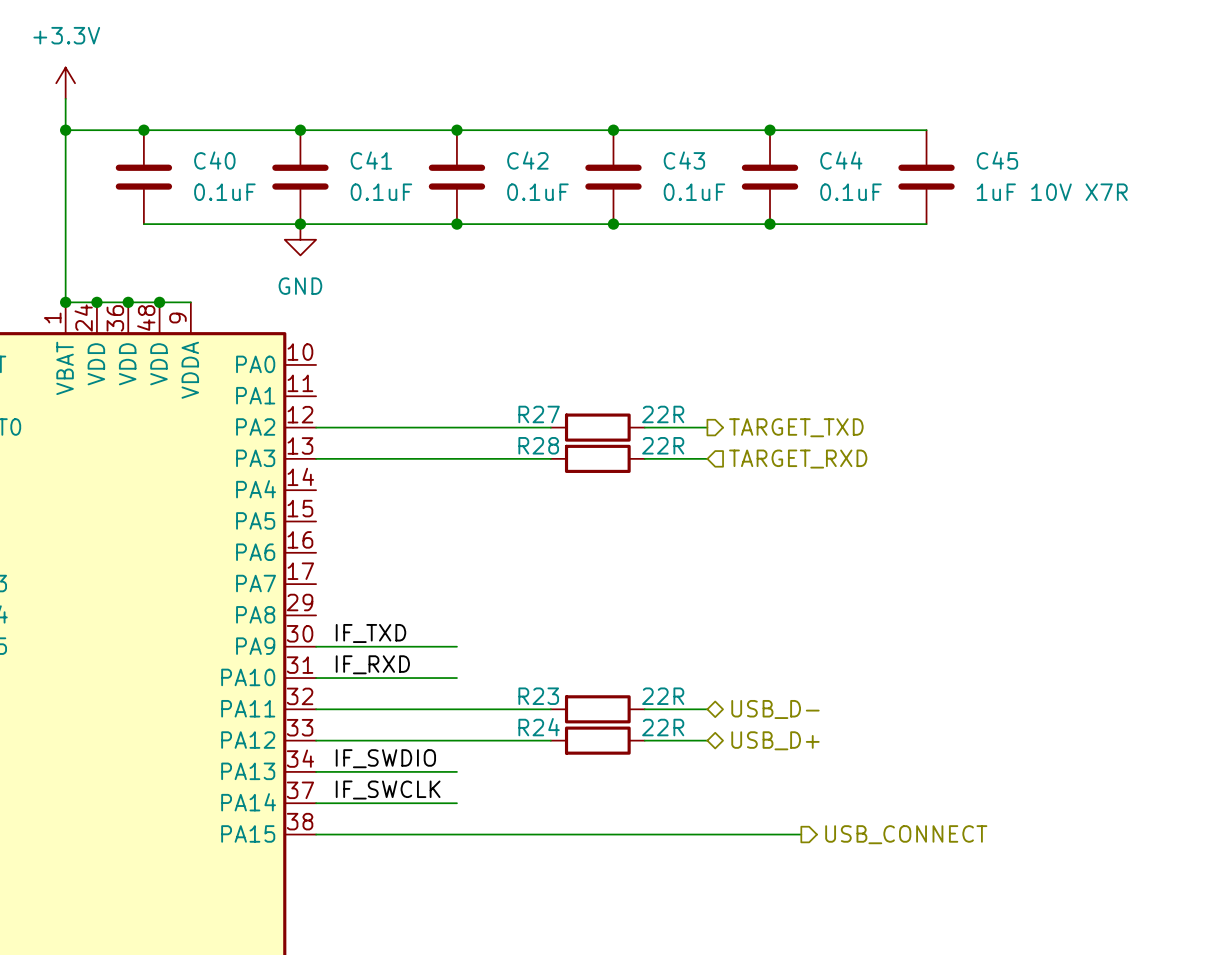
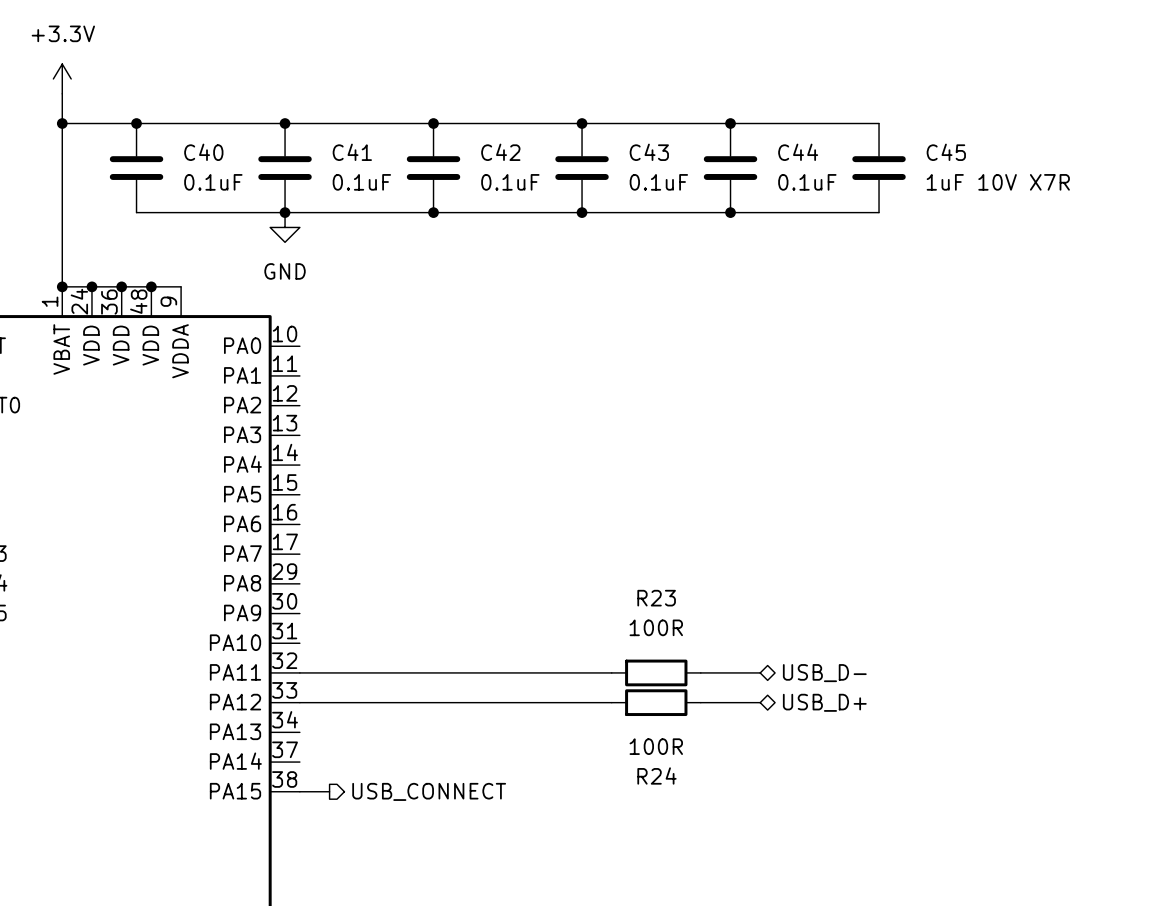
wire: (316, 427) (550, 427) -> none
R27: 22R (597, 427) -> none
wire: (644, 427) (707, 427) -> (700, 672) (760, 672)
hierarchical label: TARGET_TXD (796, 427) -> none
wire: (316, 458) (550, 458) -> none
R28: 22R (597, 458) -> none
wire: (644, 458) (707, 458) -> (700, 702) (760, 702)
hierarchical label: TARGET_RXD (798, 459) -> none
label: IF_TXD (370, 633) -> none
wire: (316, 646) (456, 646) -> none
label: IF_RXD (372, 664) -> none
wire: (316, 678) (456, 678) -> none
R23 name position: R23 (538, 696) -> R23 (656, 598)
R23 value: 22R (663, 696) -> 100R (656, 627)
R23 position: (597, 709) -> (656, 672)
wire: (644, 709) (707, 709) -> (611, 672) (522, 672)
hierarchical label position: USB_D- (775, 709) -> USB_D- (824, 673)
R24 name position: R24 (539, 727) -> R24 (656, 775)
R24 value: 22R (663, 727) -> 100R (656, 746)
R24 position: (597, 740) -> (656, 702)
wire: (644, 740) (707, 740) -> (611, 702) (522, 702)
hierarchical label position: USB_D+ (775, 740) -> USB_D+ (824, 702)
label: IF_SWDIO (385, 758) -> none
wire: (316, 771) (456, 771) -> none
label: IF_SWCLK (388, 790) -> none
wire: (316, 803) (456, 803) -> none
wire: (347, 834) (801, 834) -> none
hierarchical label: none -> USB_CONNECT (429, 791)
hierarchical label: USB_CONNECT (906, 834) -> none

